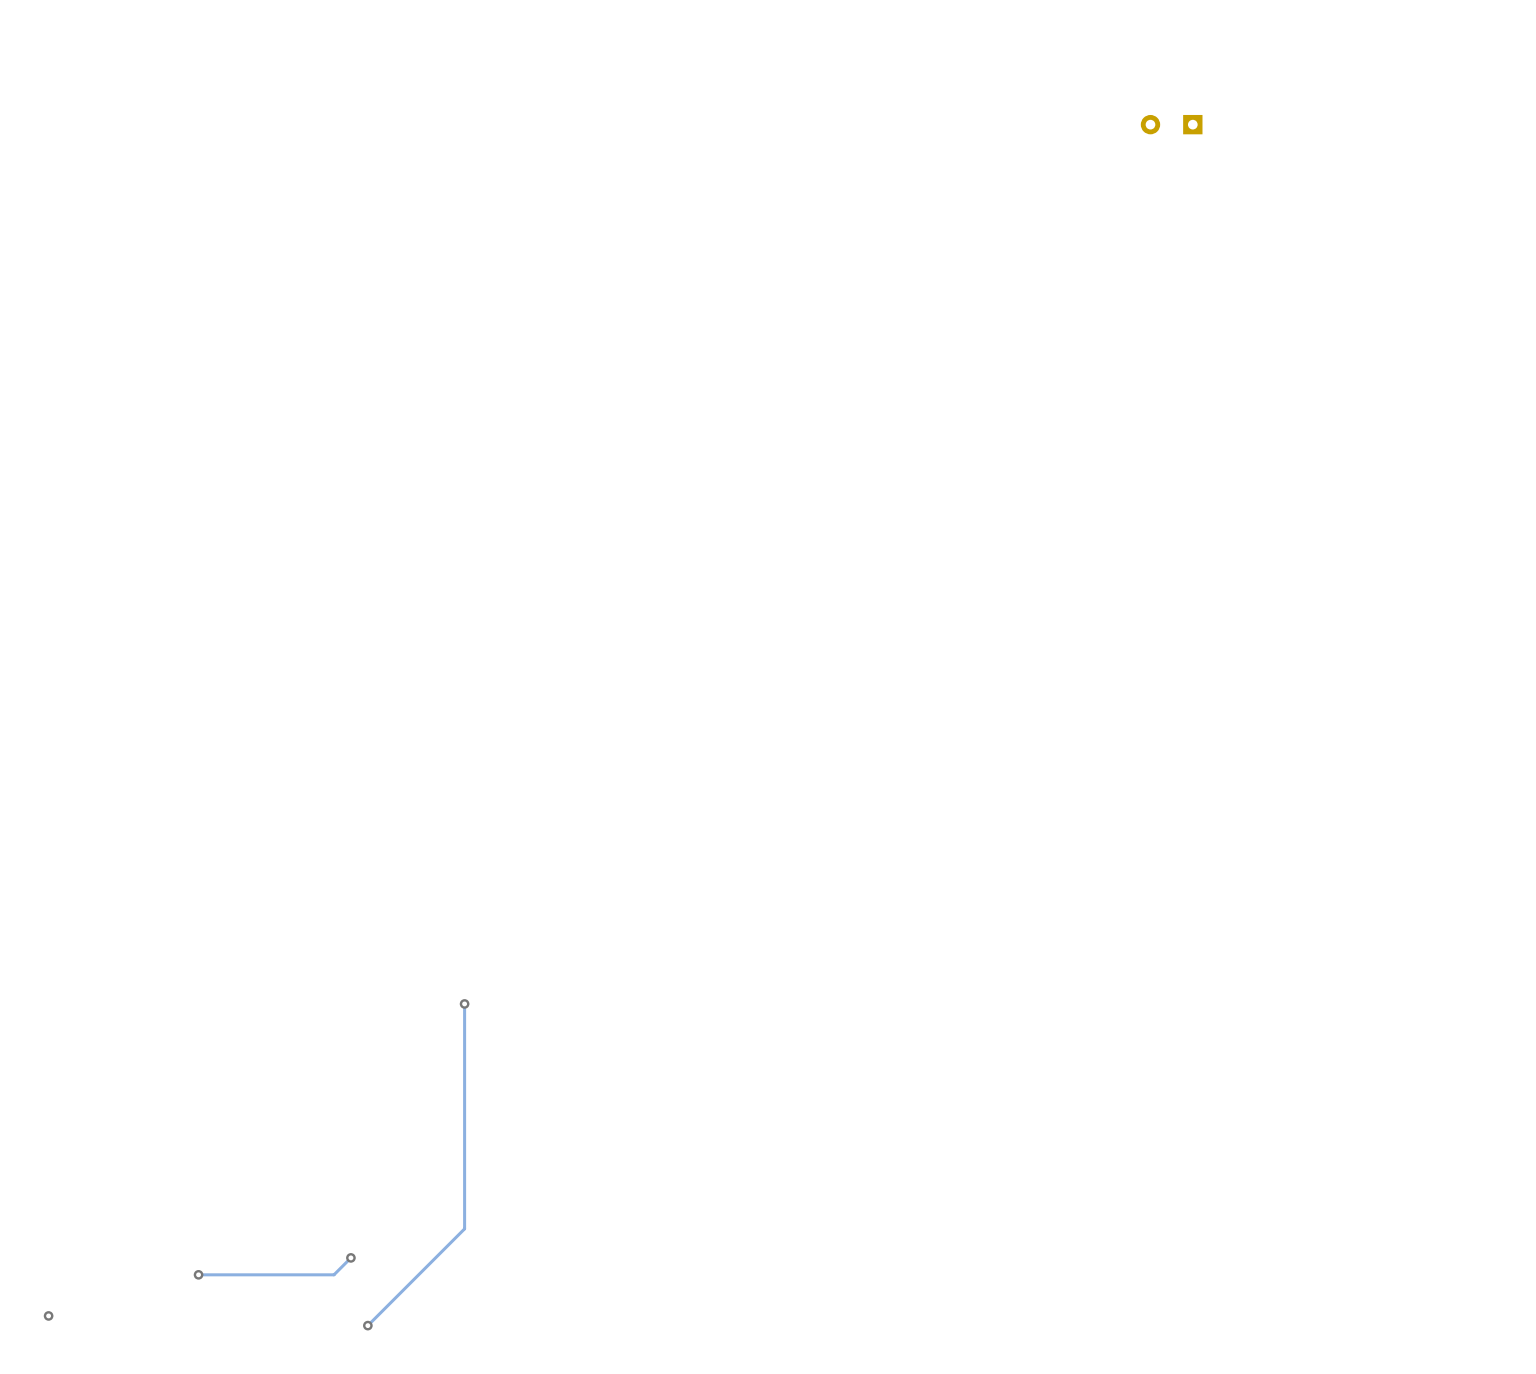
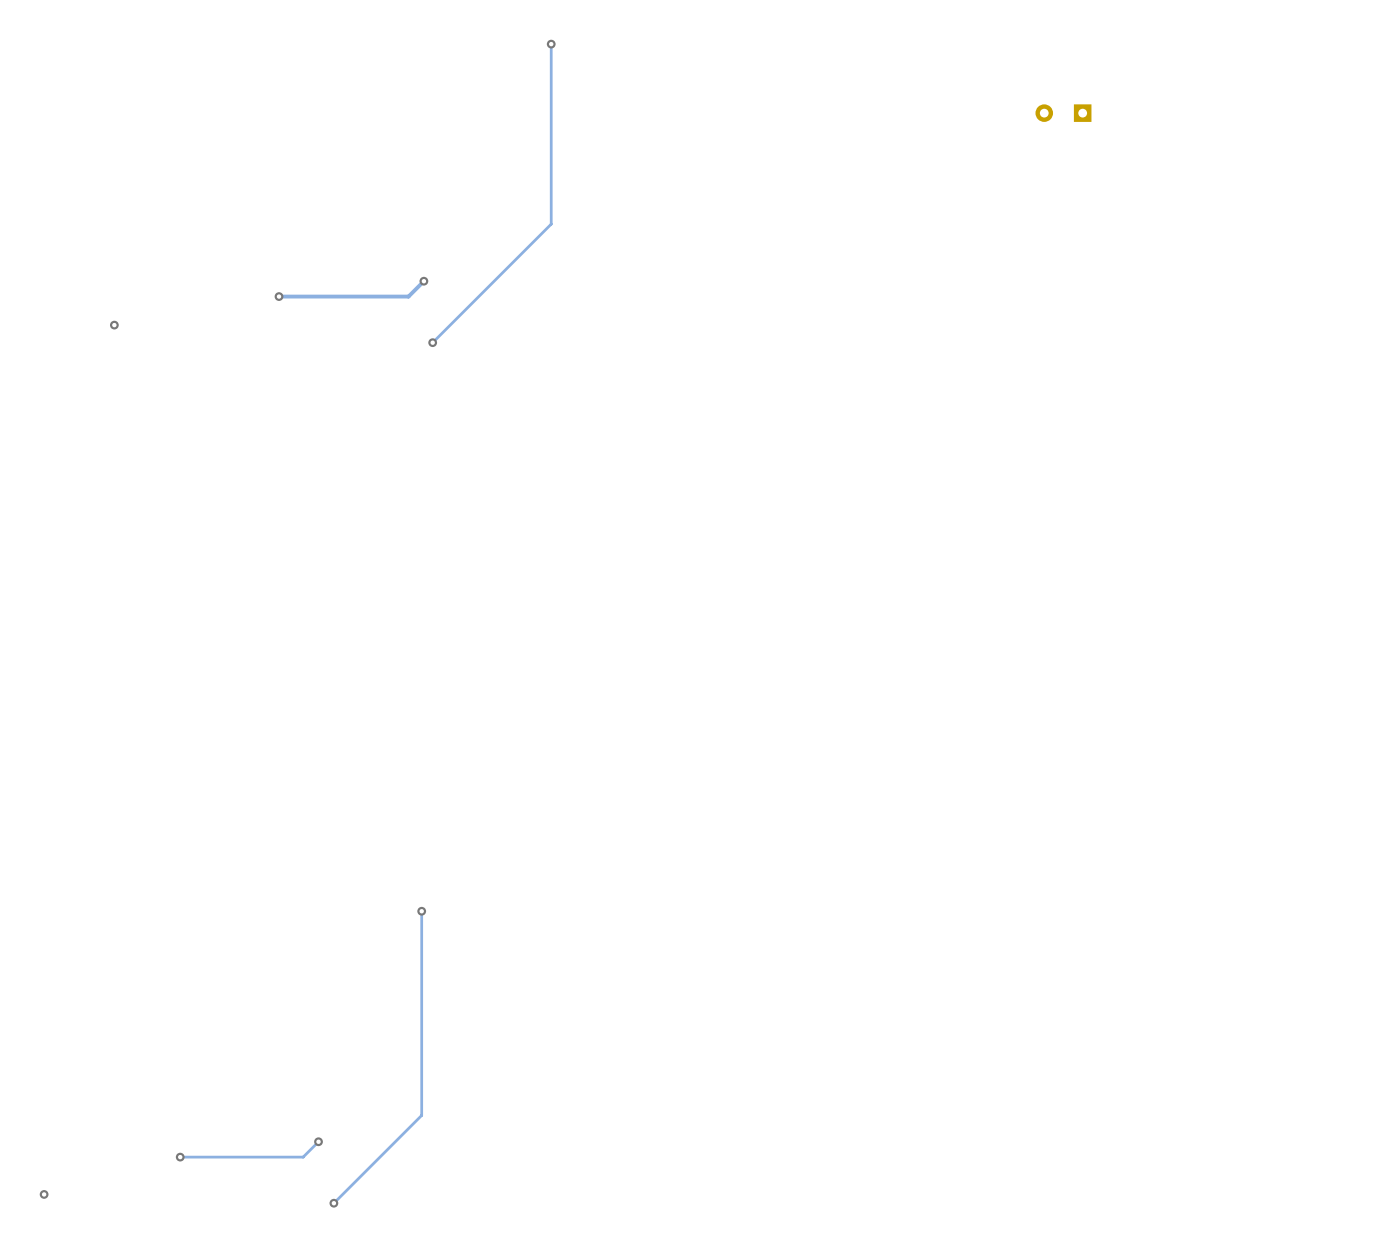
track: none -> (551, 44) (551, 224) (432, 342)
via: none -> (551, 44)
track: none -> (423, 281) (408, 296) (279, 296)
via: none -> (423, 281)
via: none -> (279, 296)
via: none -> (114, 325)
via: none -> (432, 342)

